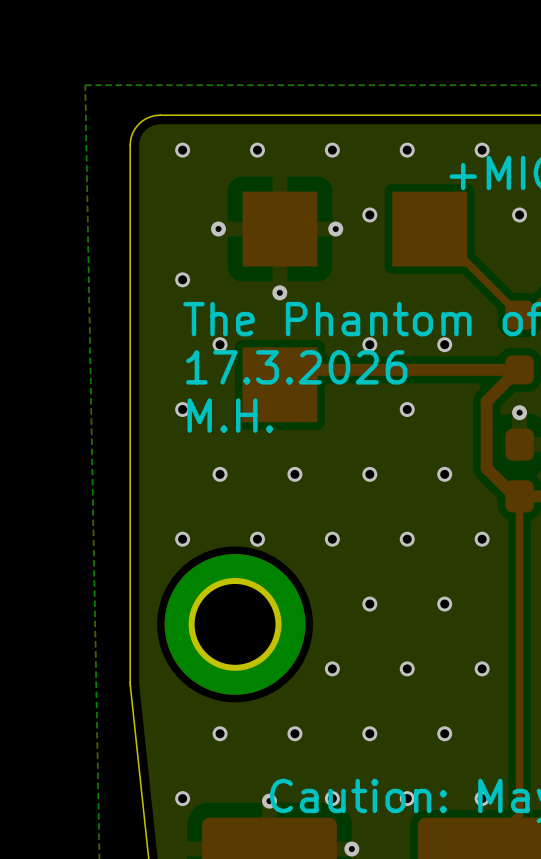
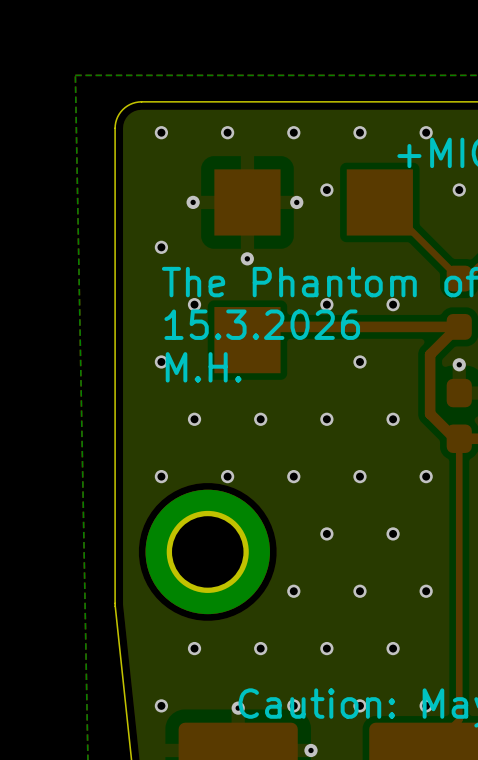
text: 17.3.2026 (296, 367) -> 15.3.2026 (262, 324)

